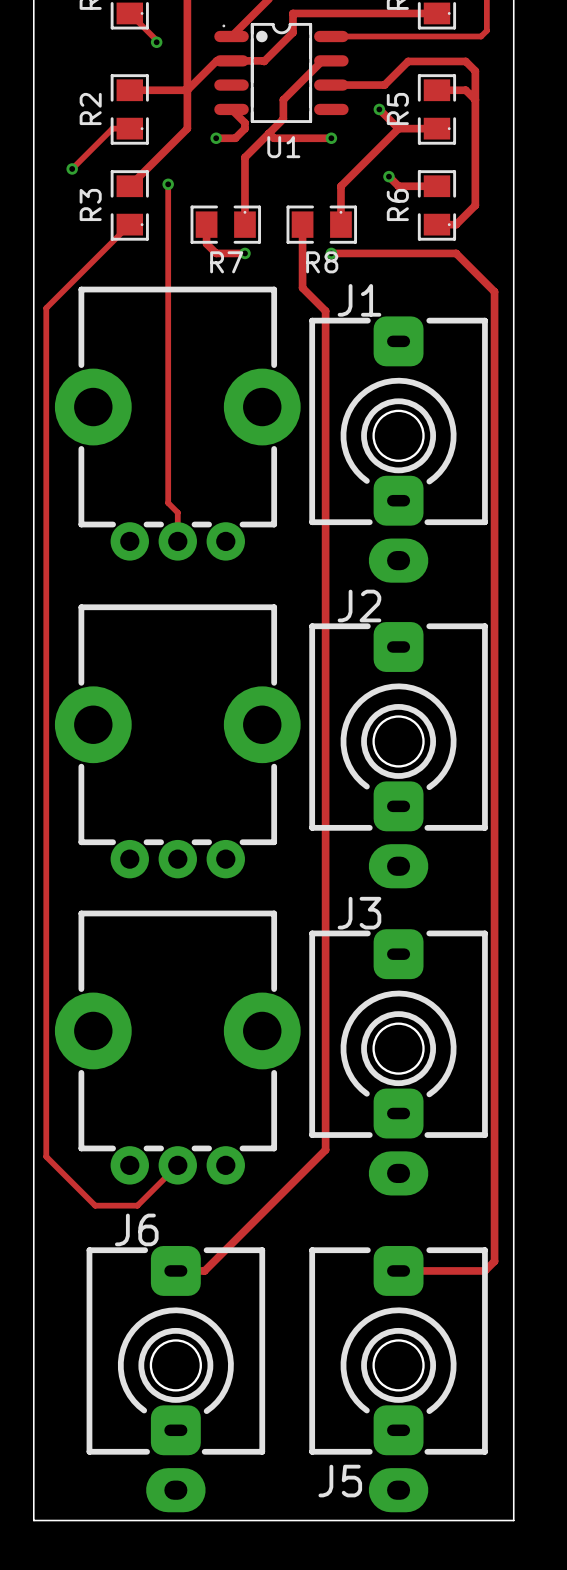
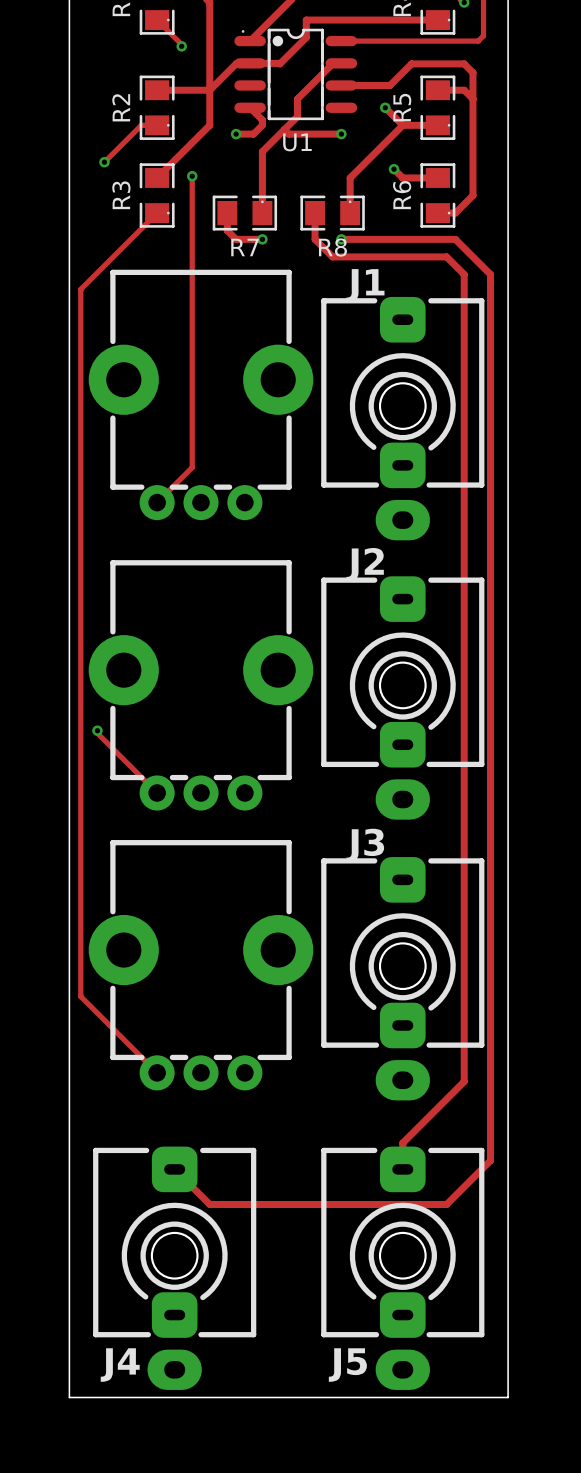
track: (302, 253) (302, 287) (325, 311) (325, 1149) (204, 1270) (175, 1270) -> (315, 239) (332, 256) (446, 256) (464, 274) (464, 1081) (402, 1143) (402, 1169)
track: (168, 503) (177, 512) (177, 541) -> (192, 467) (157, 502)
track: none -> (97, 730) (97, 733) (157, 793)
via: none -> (97, 730)
track: (46, 1081) (46, 1156) (95, 1205) (137, 1205) (177, 1165) -> (80, 996) (157, 1072)
track: (398, 1270) (484, 1270) -> (174, 1169) (209, 1204) (446, 1204) (481, 1169)
J4: none -> (174, 1268)
J6: (175, 1379) -> none

